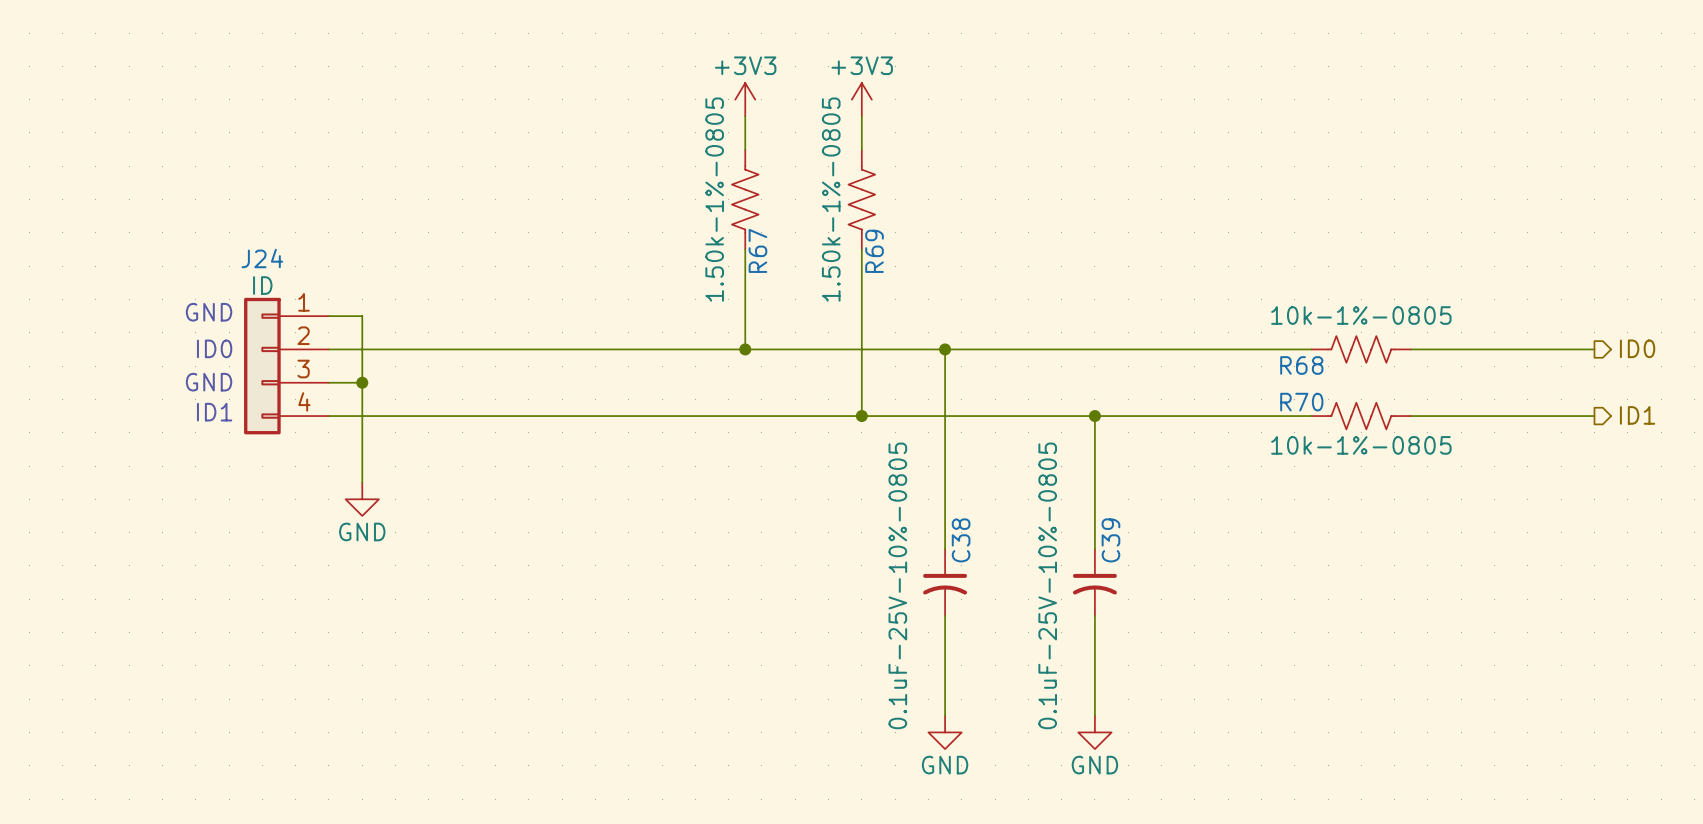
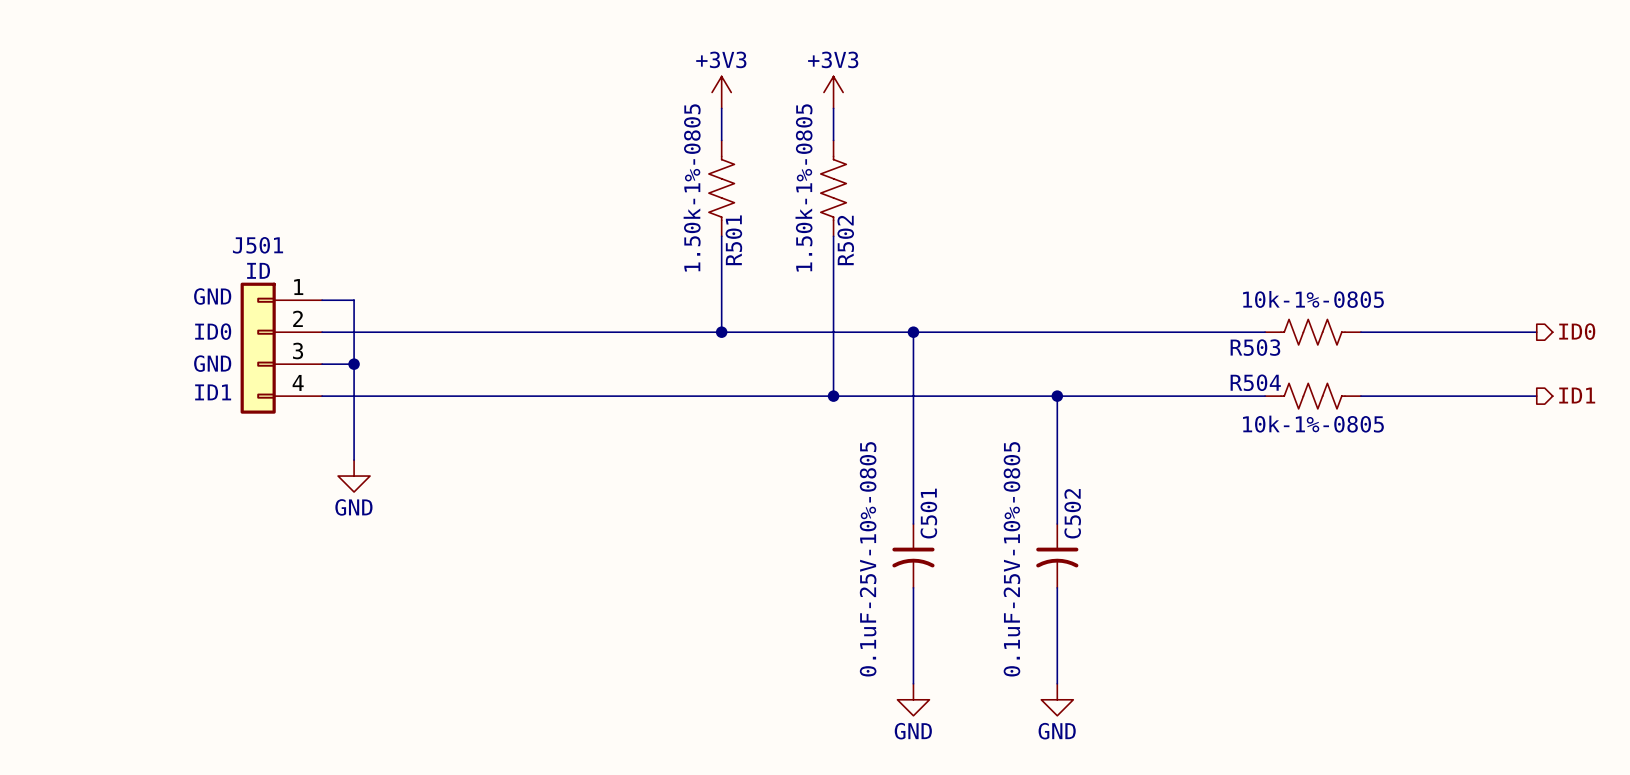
R67 name: R67 (757, 250) -> R501 (733, 240)
R69 name: R69 (874, 251) -> R502 (845, 240)
J24 name: J24 (262, 258) -> J501 (258, 245)
R68 name: R68 (1301, 365) -> R503 (1255, 347)
R70 name: R70 (1301, 402) -> R504 (1255, 382)
C38 name: C38 (961, 540) -> C501 (928, 513)
C39 name: C39 (1110, 540) -> C502 (1072, 513)

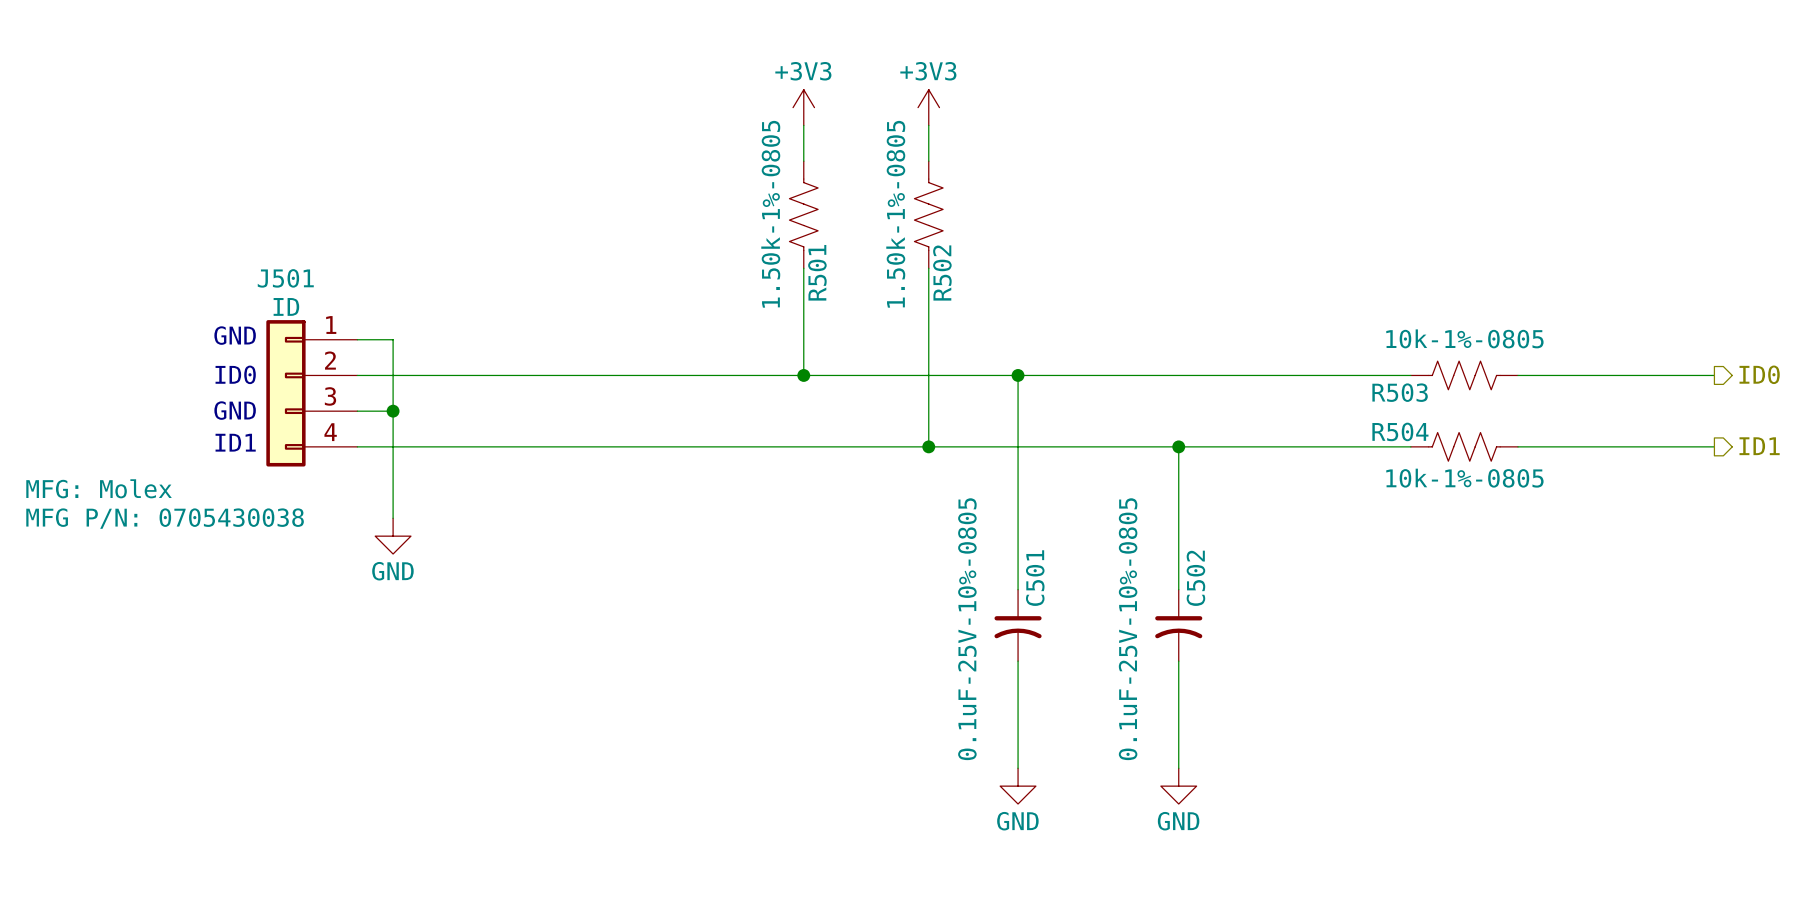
J501 text: none -> MFG: Molex (99, 488)
J501 text: none -> MFG P/N: 0705430038 (165, 518)

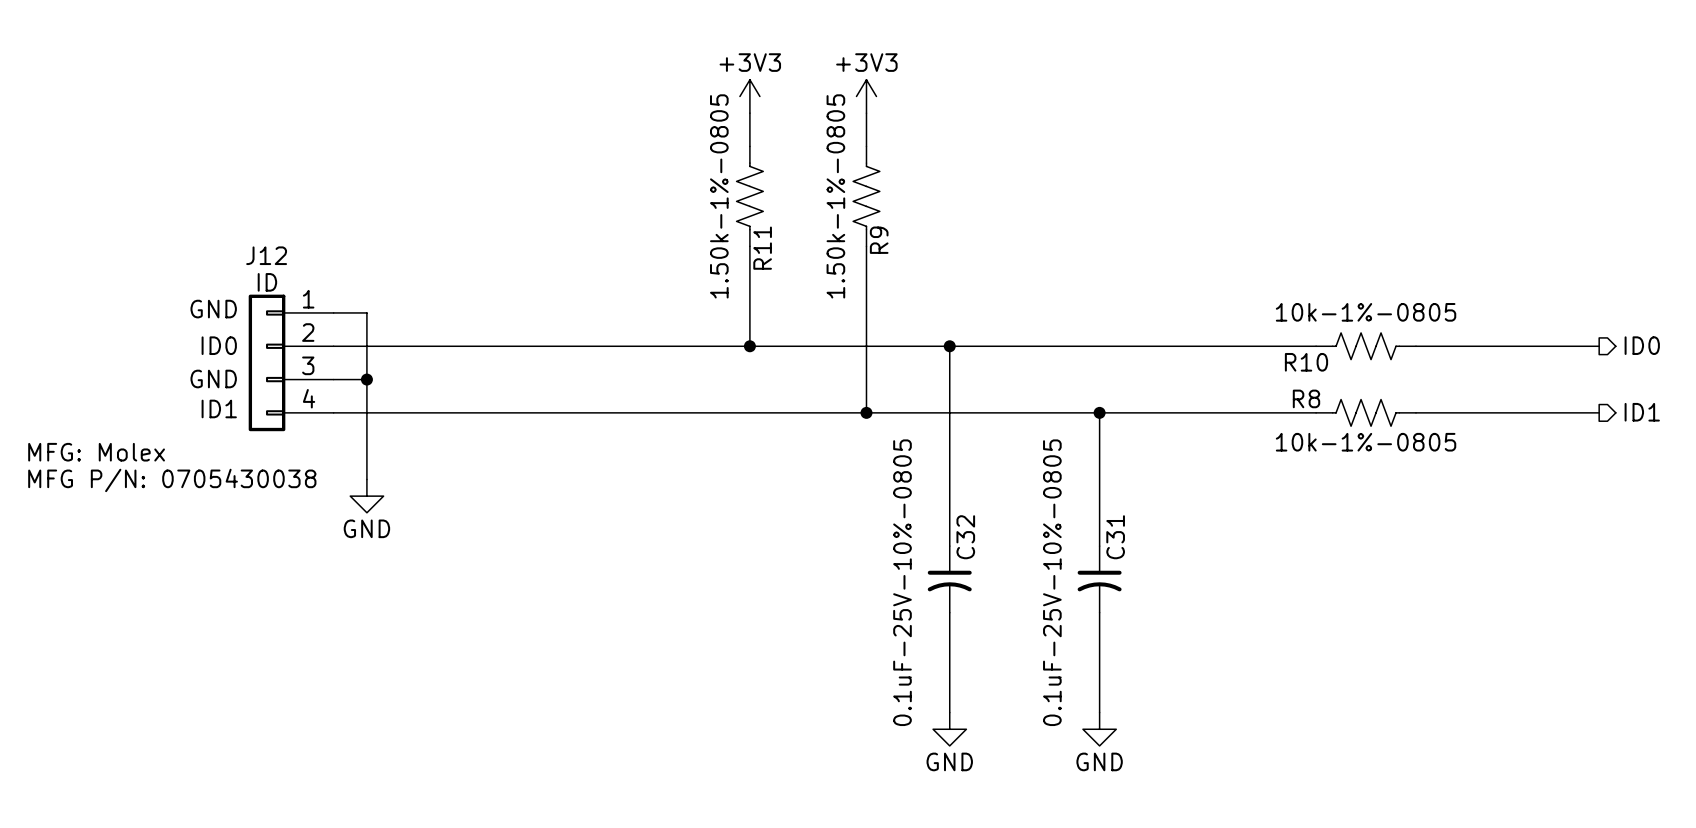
R501 name: R501 (817, 272) -> R11 (762, 248)
R502 name: R502 (942, 273) -> R9 (879, 240)
J501 name: J501 (285, 278) -> J12 (266, 255)
R503 name: R503 (1400, 392) -> R10 (1306, 362)
R504 name: R504 (1400, 431) -> R8 (1306, 398)
C501 name: C501 (1035, 578) -> C32 (965, 537)
C502 name: C502 (1195, 578) -> C31 (1115, 537)

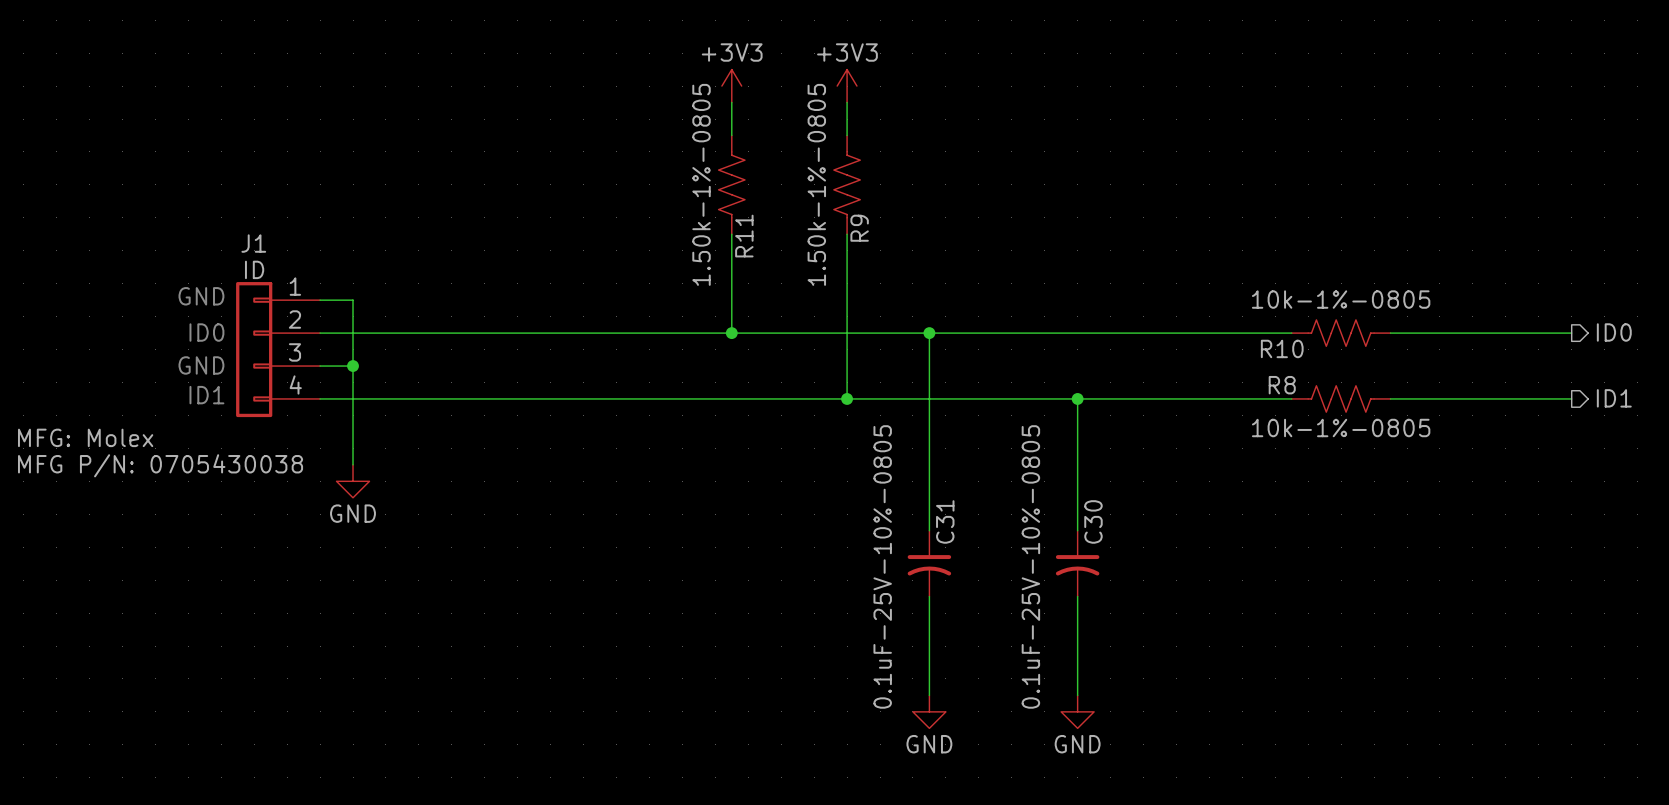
J12 name: J12 (266, 255) -> J1 (253, 243)
C32 name: C32 (965, 537) -> C31 (945, 521)
C31 name: C31 (1115, 537) -> C30 (1093, 521)

